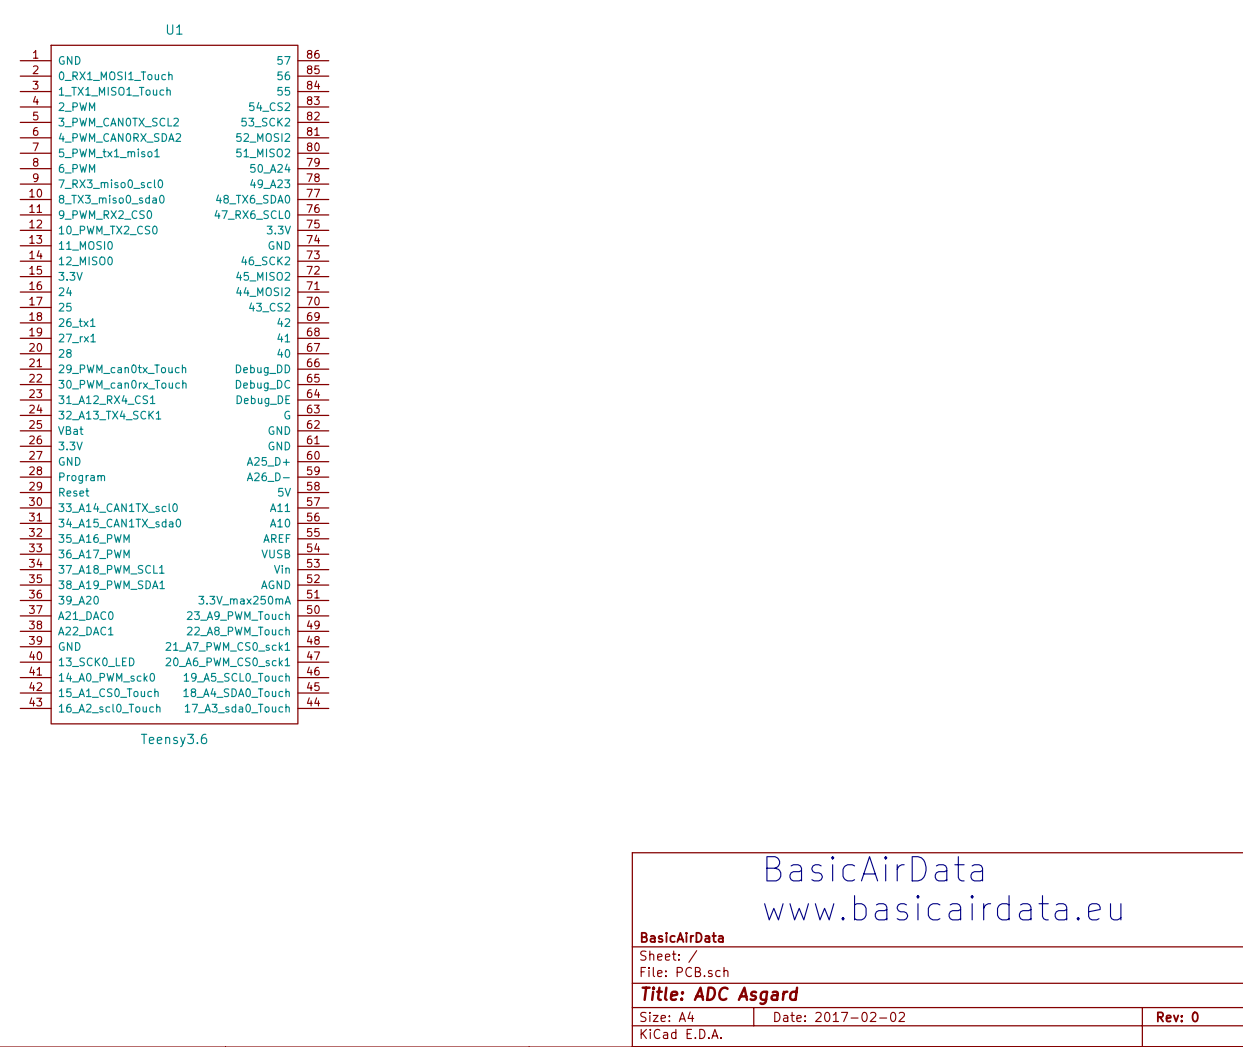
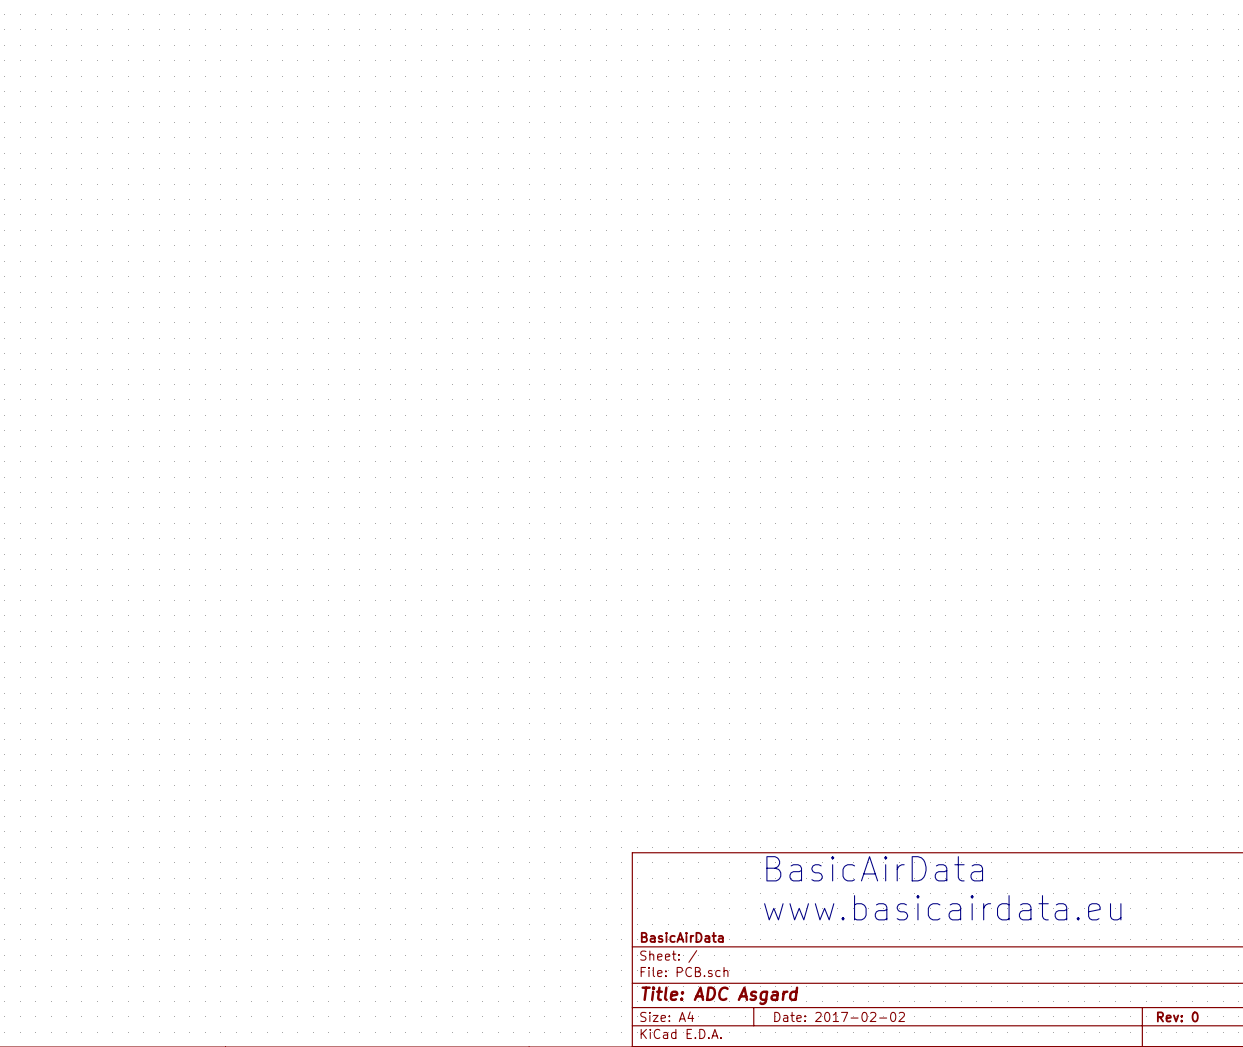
U1: Teensy3.6 (174, 384) -> none

